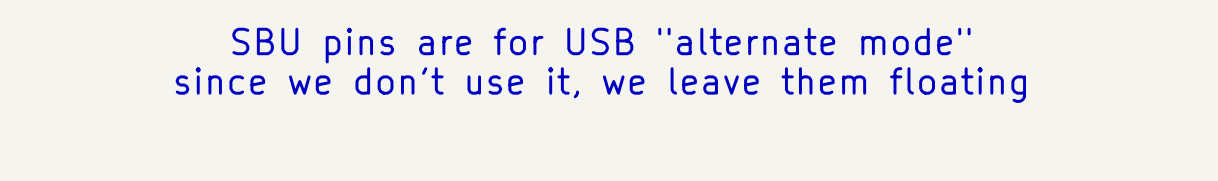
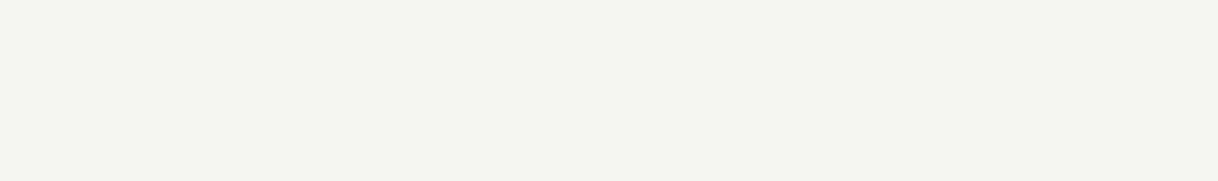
text: SBU pins are for USB "alternate mode" (601, 45) -> none
text: since we don't use it, we leave them floating (600, 85) -> none

